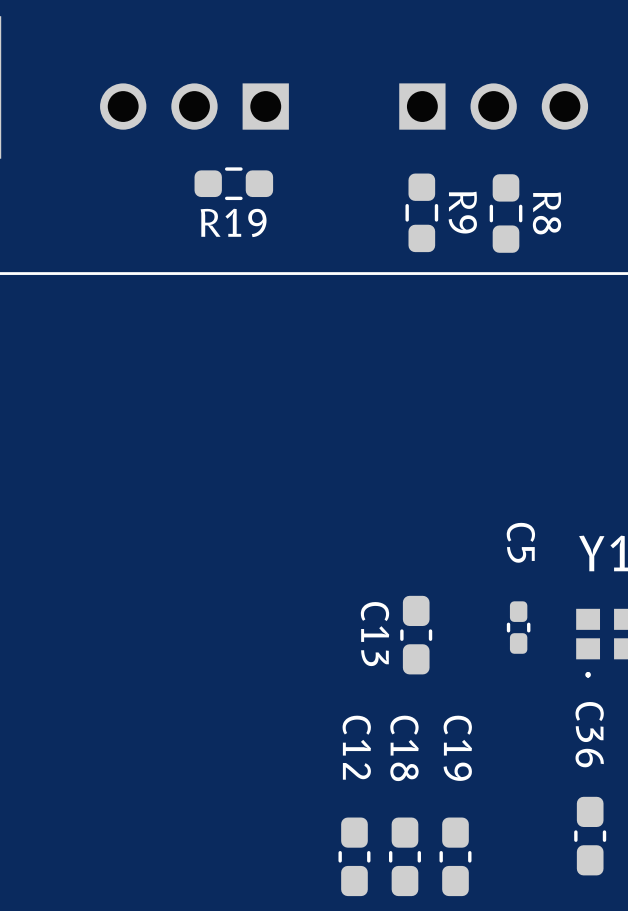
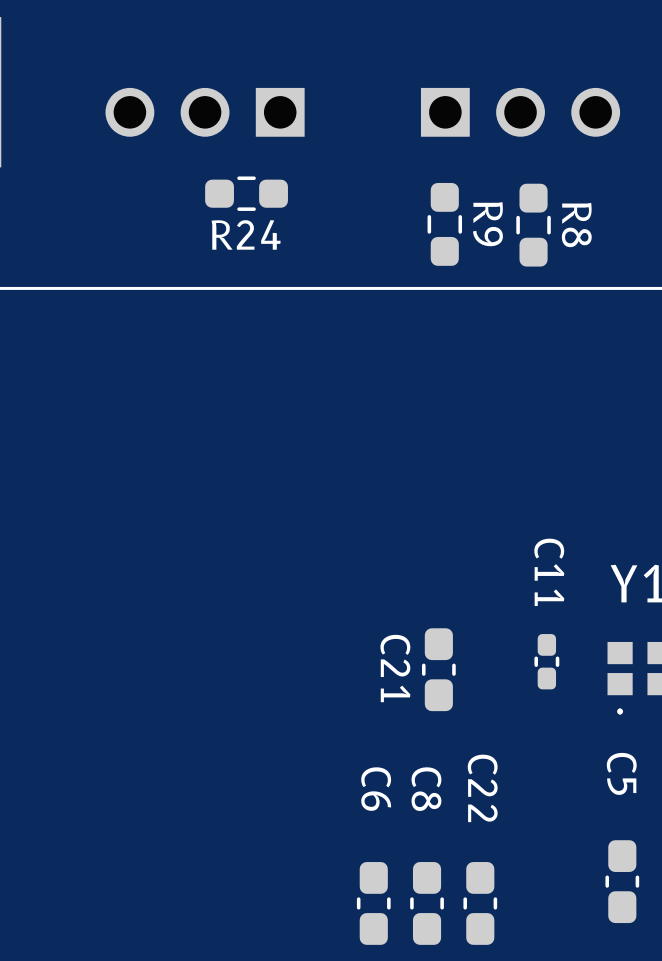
R19 name: R19 (233, 222) -> R24 (246, 234)
C5 name: C5 (520, 542) -> C11 (549, 572)
C13 name: C13 (375, 634) -> C21 (395, 668)
C36 name: C36 (589, 734) -> C5 (621, 773)
C12 name: C12 (356, 747) -> C6 (376, 789)
C18 name: C18 (404, 748) -> C8 (426, 789)
C19 name: C19 (457, 748) -> C22 (482, 788)

